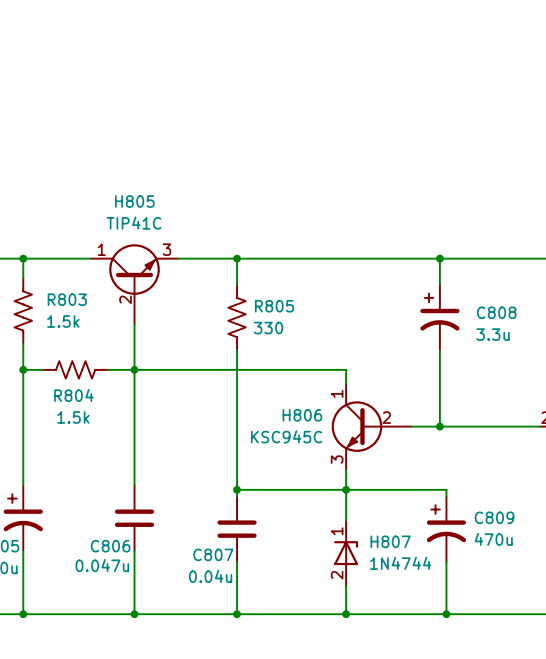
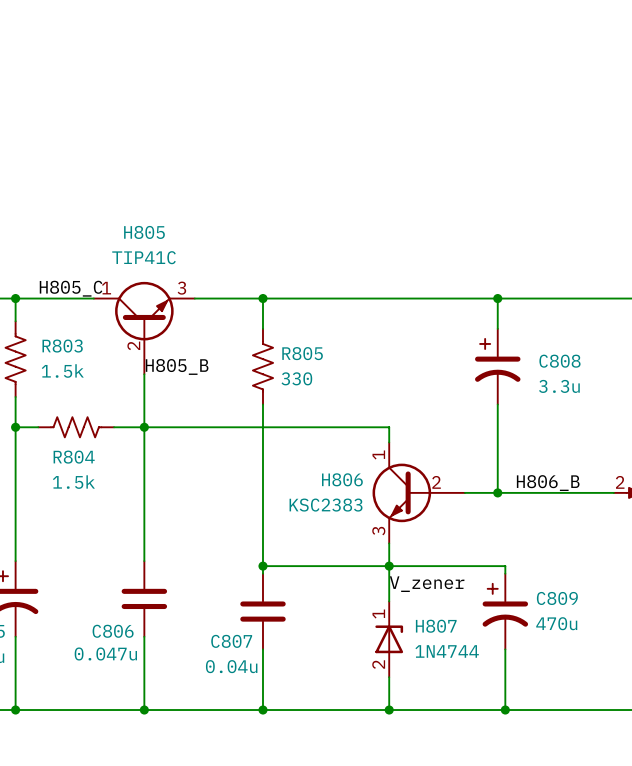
label: none -> H805_C (71, 288)
label: none -> H805_B (177, 366)
label: none -> H806_B (548, 483)
H806 value: KSC945C (286, 436) -> KSC2383 (326, 505)
label: none -> V_zener (427, 584)

